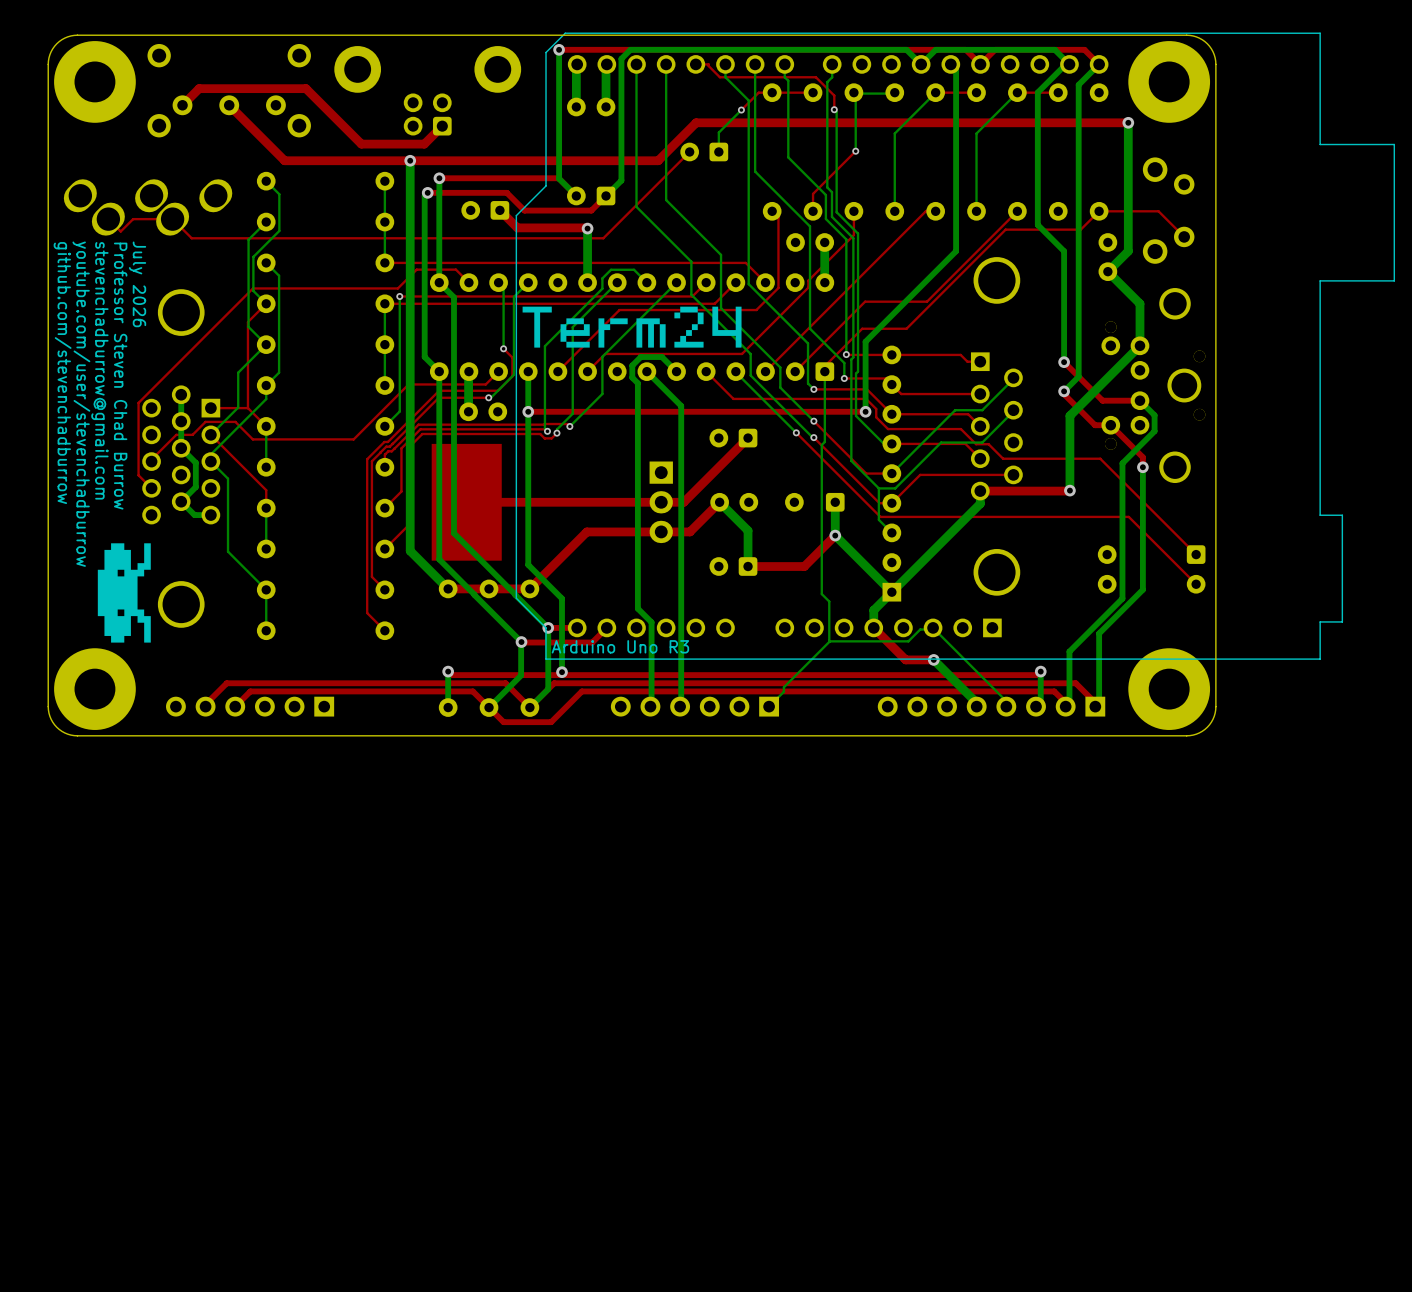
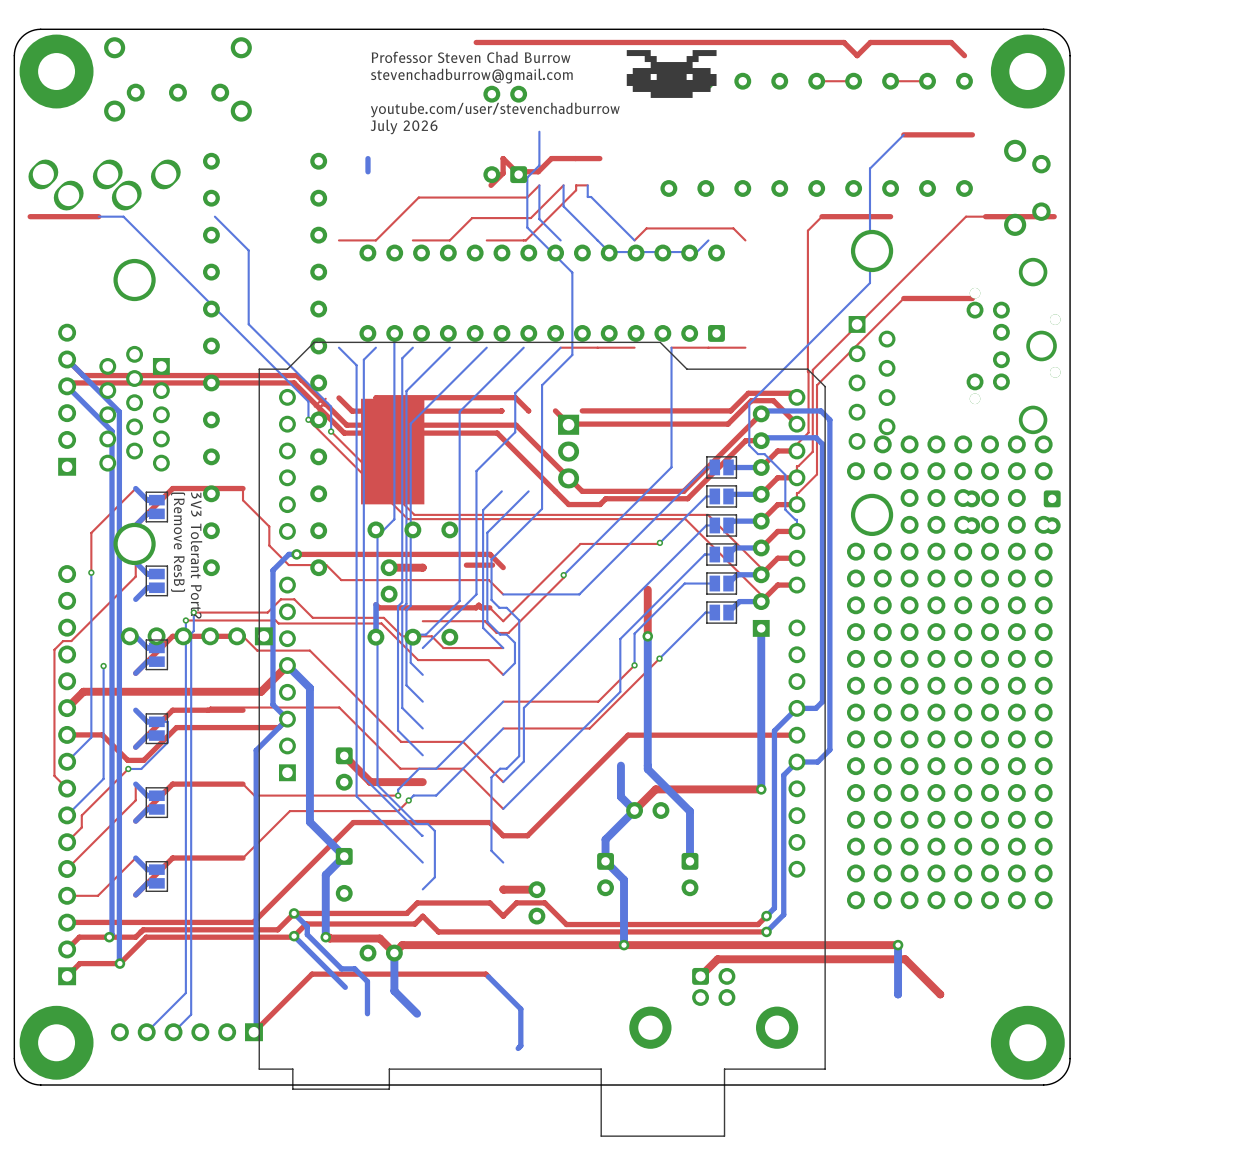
bottom track: (559, 49) (559, 178) (576, 195) -> none
via: (559, 49) -> none
drawing: none -> [626, 50, 717, 98]
bottom track: (577, 64) (576, 107) -> none
bottom track: (606, 64) (606, 107) -> none
bottom track: (636, 64) (636, 206) (691, 261) (691, 294) (750, 354) (750, 375) (813, 437) -> none
bottom track: (666, 64) (666, 200) (721, 254) (721, 308) (780, 367) (780, 387) (813, 421) -> none
top track: (695, 64) (708, 64) (719, 77) (815, 77) (834, 95) (834, 109) -> none
bottom track: (725, 64) (725, 77) (748, 100) (748, 284) (808, 343) (808, 383) (813, 389) -> none
bottom track: (755, 64) (755, 171) (810, 226) (810, 328) (844, 363) (844, 378) -> none
bottom track: (784, 64) (784, 77) (788, 80) (788, 157) (825, 195) (825, 218) (846, 239) (846, 354) -> none
bottom track: (832, 64) (832, 77) (827, 82) (827, 187) (831, 192) (831, 216) (853, 238) (851, 460) (878, 488) -> none
bottom track: (950, 64) (956, 69) (956, 251) (865, 341) (865, 411) -> none
bottom track: (1099, 64) (1078, 84) (1078, 376) (1064, 391) -> none
text: none -> Professor Steven Chad Burrow (471, 57)
text: none -> stevenchadburrow@gmail.com (471, 76)
part: (427, 90) -> none
top track: (813, 92) (758, 92) (741, 110) -> none
bottom track: (894, 92) (853, 92) -> none
bottom track: (935, 92) (894, 133) (894, 211) -> none
bottom track: (1017, 92) (976, 133) (976, 211) -> none
bottom track: (855, 93) (855, 151) -> none
top track: (182, 105) (199, 88) (306, 88) (361, 144) (424, 144) (442, 126) -> none
top track: (229, 105) (284, 160) (658, 160) (696, 122) (1128, 122) -> none
bottom track: (834, 109) (836, 112) (836, 212) (858, 233) (858, 371) (856, 373) (856, 415) (883, 443) (891, 443) -> none
via: (834, 109) -> none
bottom track: (741, 110) (718, 132) (718, 151) -> none
via: (741, 110) -> none
bottom track: (1128, 122) (1128, 251) (1107, 271) (1139, 303) (1139, 345) (1069, 415) (1069, 490) -> none
via: (1128, 122) -> none
text: none -> youtube.com/user/stevenchadburrow (495, 109)
text: none -> July 2026 (404, 126)
bottom track: none -> (539, 131) (539, 165) (527, 177) (527, 227) (572, 272) (572, 355) (542, 385) (542, 508) (491, 559) (491, 599) (499, 607) (506, 607) (519, 620) (519, 756) (506, 768) (500, 768) (491, 777) (491, 850) (503, 862)
top track: (689, 151) (603, 238) (191, 238) (172, 219) (133, 219) (120, 231) (108, 219) -> none
part: (704, 151) -> none
top track: (855, 151) (813, 193) (813, 211) -> none
via: (855, 151) -> none
bottom track: none -> (903, 134) (869, 168) (869, 283) (749, 403) (749, 445) (758, 454) (764, 454) (785, 474) (785, 509) (796, 519) (796, 531)
top track: none -> (972, 134) (903, 134)
bottom track: (410, 160) (410, 550) (448, 588) -> none
via: (410, 160) -> none
top track: (439, 178) (558, 178) (576, 195) -> none
via: (439, 178) -> none
top track: none -> (599, 158) (551, 158) (538, 171) (516, 171) (503, 158) (503, 173) (491, 185)
bottom track: (266, 181) (279, 194) (279, 230) (253, 256) (253, 290) (266, 303) -> none
bottom track: (384, 181) (384, 262) -> none
top track: (427, 192) (506, 192) (524, 210) (591, 210) (606, 195) -> none
bottom track: (427, 192) (424, 195) (424, 357) (439, 371) (439, 559) (521, 642) -> none
via: (427, 192) -> none
bottom track: (439, 192) (439, 282) (454, 297) (454, 533) (548, 627) (548, 689) (529, 707) -> none
bottom track: (606, 195) (621, 180) (621, 58) (630, 49) (906, 49) (921, 64) (935, 49) (1054, 49) (1069, 64) (1065, 64) (1037, 92) (1037, 224) (1064, 251) (1064, 362) -> none
top track: none -> (539, 185) (527, 197) (418, 197) (375, 240) (338, 240)
bottom track: none -> (539, 185) (539, 219) (560, 240)
top track: none -> (563, 185) (530, 218) (472, 218) (449, 240) (412, 240)
bottom track: none -> (563, 185) (563, 206) (609, 252) (696, 252) (708, 240)
top track: none -> (587, 185) (576, 185) (576, 190) (525, 240) (486, 240)
bottom track: none -> (587, 185) (587, 196) (591, 196) (634, 240)
part: (485, 210) -> none
top track: (499, 210) (517, 227) (587, 228) -> none
top track: (772, 211) (778, 217) (778, 287) (756, 310) (619, 310) (557, 371) -> none
top track: (853, 211) (853, 235) (808, 280) (808, 287) (742, 353) (605, 353) (587, 371) -> none
top track: (935, 211) (925, 211) (765, 371) -> none
top track: (1017, 211) (927, 301) (865, 301) (795, 371) -> none
bottom track: (266, 222) (248, 239) (248, 326) (266, 344) (238, 372) (238, 407) (210, 434) -> none
bottom track: (587, 228) (587, 282) -> none
via: (587, 228) -> none
top track: (1184, 236) (1158, 211) (1099, 211) (1080, 229) (1005, 229) (906, 328) (862, 328) (824, 366) (824, 371) -> none
top track: none -> (98, 216) (30, 216)
bottom track: none -> (98, 216) (123, 216) (308, 401) (308, 419)
bottom track: none -> (214, 216) (248, 250) (248, 324) (331, 406) (331, 431)
part: (810, 242) -> none
bottom track: (824, 242) (824, 282) -> none
top track: none -> (890, 216) (821, 216) (807, 230) (808, 432) (790, 450)
top track: none -> (1054, 216) (966, 216) (812, 369) (812, 451) (796, 466) (796, 477) (777, 477) (761, 494)
part: (1107, 257) -> none
bottom track: (266, 262) (279, 275) (279, 372) (266, 385) (266, 399) (210, 454) (210, 461) (228, 478) (228, 551) (266, 589) (266, 630) -> none
top track: (384, 262) (745, 262) (765, 282) -> none
top track: none -> (745, 240) (733, 228) (646, 228) (634, 240)
top track: (468, 282) (455, 269) (416, 269) (397, 288) (252, 288) (138, 402) (138, 475) (151, 488) -> none
bottom track: (498, 282) (503, 287) (503, 348) -> none
bottom track: (528, 282) (513, 296) (513, 374) (488, 397) -> none
bottom track: (617, 282) (572, 327) (572, 413) (556, 429) (556, 433) -> none
bottom track: (646, 282) (634, 269) (611, 269) (602, 278) (602, 288) (544, 346) (544, 428) (547, 431) -> none
bottom track: (676, 282) (602, 356) (602, 393) (569, 426) -> none
top track: (706, 282) (692, 296) (399, 296) -> none
top track: (735, 282) (714, 303) (384, 303) -> none
text: July 2026 (137, 284) -> none
bottom track: (399, 296) (399, 411) (384, 426) -> none
via: (399, 296) -> none
top track: (266, 303) (247, 322) (247, 408) -> none
bottom track: (384, 303) (384, 385) -> none
drawing: [522, 306, 742, 348] -> none
top track: none -> (972, 298) (903, 298) (817, 385) (817, 474) (796, 493) (796, 504) (777, 504) (761, 521)
part: (955, 346) -> none
top track: (503, 348) (512, 357) (512, 376) (498, 390) (439, 390) (387, 441) (384, 441) (367, 459) (367, 613) (384, 630) -> none
via: (503, 348) -> none
top track: (846, 354) (960, 354) (967, 361) (980, 361) -> none
via: (846, 354) -> none
top track: (1064, 362) (1102, 400) (1139, 400) -> none
via: (1064, 362) -> none
text: stevenchadburrow@gmail.com (99, 370) -> none
bottom track width: thick (468, 371) (468, 411) -> thin (394, 333) (394, 369)
top track: (498, 371) (485, 384) (408, 384) (353, 439) (252, 439) (235, 421) (205, 421) (192, 434) (176, 434) (151, 461) -> none
bottom track: (528, 371) (528, 564) (562, 598) (562, 672) -> none
bottom track: (646, 371) (681, 405) (680, 706) -> none
bottom track: (676, 371) (661, 357) (640, 357) (632, 365) (632, 377) (637, 383) (637, 608) (651, 622) (650, 706) -> none
top track: (706, 371) (733, 398) (866, 398) (876, 408) (876, 417) (888, 429) (960, 429) (976, 444) (988, 444) (1003, 458) (1100, 458) (1196, 554) -> none
bottom track: (735, 371) (796, 432) -> none
bottom track: (824, 371) (824, 441) (821, 445) (821, 594) (829, 601) (829, 641) -> none
text: github.com/stevenchadburrow (62, 373) -> none
text: Professor Steven Chad Burrow (120, 376) -> none
bottom track: (1013, 377) (982, 410) (955, 410) (891, 473) -> none
top track: (844, 378) (885, 378) (901, 394) (980, 394) -> none
via: (844, 378) -> none
bottom track: none -> (338, 347) (356, 365) (356, 796) (422, 862)
bottom track: none -> (375, 347) (363, 359) (363, 777) (422, 835)
bottom track: none -> (412, 347) (402, 358) (402, 602) (398, 606) (398, 730) (422, 755)
bottom track: none -> (449, 347) (406, 391) (406, 604) (402, 608) (402, 707) (422, 728)
bottom track: none -> (486, 347) (410, 423) (410, 605) (406, 609) (406, 685) (422, 701)
bottom track: none -> (523, 347) (459, 411) (459, 600) (426, 634) (419, 634) (410, 643) (410, 662) (422, 674)
bottom track: none -> (560, 347) (515, 393) (515, 432) (476, 471) (476, 594) (422, 648)
top track: none -> (634, 347) (560, 347)
bottom track: none -> (671, 347) (671, 467) (563, 575)
top track: none -> (745, 347) (671, 347)
top track: (813, 389) (866, 389) (891, 414) (968, 414) (980, 426) -> none
via: (813, 389) -> none
top track: (1064, 391) (1064, 394) (1095, 425) (1110, 425) (1142, 457) (1142, 467) -> none
via: (1064, 391) -> none
bottom track: (181, 394) (181, 448) (195, 462) (195, 487) (181, 501) (194, 515) (210, 515) -> none
top track: (488, 397) (438, 397) (392, 443) -> none
via: (488, 397) -> none
top track: none -> (67, 359) (83, 375) (297, 375) (301, 380)
bottom track: none -> (67, 359) (119, 411) (119, 963)
bottom track: (1139, 400) (1154, 415) (1154, 431) (1122, 463) (1122, 598) (1069, 651) (1069, 702) (1065, 706) -> none
text: youtube.com/user/stevenchadburrow (81, 404) -> none
top track: (247, 408) (266, 426) -> none
top track: (247, 408) (210, 408) -> none
bottom track: (1013, 410) (982, 442) (941, 442) (895, 488) (878, 488) -> none
bottom track: none -> (394, 369) (394, 519) (377, 536) (377, 784) (416, 823) (427, 823) (434, 831) (434, 877) (422, 889)
part: (483, 411) -> none
via: (528, 411) -> none
top track: (865, 411) (528, 411) -> none
via: (865, 411) -> none
top track: (813, 421) (866, 473) (891, 473) -> none
via: (813, 421) -> none
top track: none -> (302, 380) (346, 425) (516, 425) (582, 491) (683, 491) (761, 413)
bottom track: (266, 426) (266, 467) -> none
top track: (569, 426) (567, 424) (418, 424) (394, 448) -> none
via: (569, 426) -> none
top track: none -> (67, 386) (70, 382) (294, 382) (344, 433) (497, 433) (568, 504) (600, 504) (605, 498) (687, 498) (745, 440) (761, 440)
bottom track: none -> (67, 386) (111, 431) (111, 934) (109, 937)
top track: (547, 431) (545, 429) (420, 429) (401, 448) (401, 491) (384, 508) -> none
via: (547, 431) -> none
top track: (796, 432) (880, 516) (1128, 516) (1196, 584) -> none
via: (796, 432) -> none
top track: (556, 433) (551, 438) (544, 438) -> none
via: (556, 433) -> none
top track: (210, 434) (266, 490) (266, 508) -> none
top track: (813, 437) (879, 503) (891, 503) (920, 474) (1013, 474) -> none
via: (813, 437) -> none
top track: (544, 438) (540, 434) (422, 434) (407, 449) (407, 526) (384, 548) -> none
part: (733, 438) -> none
top track: (748, 438) (683, 502) (466, 502) -> none
top track: none -> (338, 397) (352, 411) (501, 410)
top track: none -> (375, 397) (515, 397) (528, 410)
top track: none -> (796, 397) (792, 393) (748, 393) (730, 410) (582, 410)
top track: (891, 443) (965, 443) (980, 458) -> none
part: none -> (67, 399)
top track: (380, 452) (371, 461) (371, 576) (384, 589) -> none
top track: none -> (555, 410) (568, 424) (728, 424) (751, 400) (773, 400) (796, 424)
bottom track: none -> (761, 413) (764, 410) (820, 410) (829, 419) (829, 749) (817, 762) (796, 762) (783, 775) (783, 914) (766, 931)
top track: none -> (308, 419) (407, 519) (685, 519) (764, 598)
via: none -> (308, 419)
bottom track: (1142, 467) (1142, 589) (1099, 633) (1099, 702) (1095, 706) -> none
via: (1142, 467) -> none
part position: (891, 473) -> (761, 521)
top track: none -> (331, 431) (414, 514) (708, 514) (764, 571)
via: none -> (331, 431)
bottom track: (878, 488) (878, 519) (891, 532) -> none
bottom track: none -> (761, 440) (764, 437) (816, 437) (822, 444) (822, 701) (815, 708) (796, 708) (774, 730) (774, 908) (766, 916)
top track: (1069, 490) (980, 491) -> none
via: (1069, 490) -> none
bottom track: (980, 491) (980, 503) (873, 610) (873, 627) -> none
part: none -> (882, 444)
part: none -> (909, 444)
part: none -> (936, 444)
part: none -> (963, 444)
part: none -> (990, 444)
part: none -> (1016, 444)
part: none -> (1043, 444)
top track: none -> (796, 450) (777, 450) (761, 467)
top track: (719, 502) (689, 531) (586, 531) (529, 588) (448, 588) -> none
bottom track: (719, 502) (748, 530) (748, 566) -> none
part: (734, 502) -> none
part: (814, 502) -> none
bottom track: (835, 502) (835, 535) (891, 592) -> none
bottom track: (266, 508) (266, 548) -> none
bottom track: none -> (714, 467) (706, 467) (579, 594) (503, 594)
part: none -> (721, 467)
bottom track: none -> (761, 467) (728, 467)
part: none -> (855, 471)
part: none -> (882, 471)
part: none -> (909, 471)
part: none -> (936, 471)
part: none -> (963, 471)
part: none -> (990, 471)
part: none -> (1016, 471)
part: none -> (1043, 471)
top track: (835, 535) (804, 566) (748, 566) -> none
via: (835, 535) -> none
drawing: [97, 543, 151, 643] -> none
top track: none -> (135, 488) (91, 532) (91, 572)
bottom track: none -> (135, 488) (147, 500) (156, 500)
bottom track: none -> (501, 491) (483, 510) (483, 627) (503, 648)
bottom track: none -> (528, 491) (487, 532) (487, 621) (500, 634) (506, 634) (514, 642) (514, 663) (503, 674)
bottom track: none -> (761, 494) (730, 494) (728, 496)
bottom track: none -> (714, 496) (706, 496) (659, 542)
part: none -> (721, 496)
part: none -> (909, 498)
part: none -> (936, 498)
part: none -> (963, 498)
part: none -> (990, 498)
part: none -> (1016, 498)
part: none -> (156, 507)
part: (733, 566) -> none
bottom track: none -> (156, 513) (147, 513) (135, 525)
bottom track: none -> (761, 521) (732, 521) (728, 525)
part: none -> (909, 524)
part: none -> (936, 524)
part: none -> (963, 524)
part: none -> (990, 524)
part: none -> (1016, 524)
part: none -> (1043, 524)
top track: none -> (135, 525) (172, 488) (243, 488) (243, 500) (269, 526) (269, 545) (288, 565) (326, 565) (341, 580) (488, 580) (503, 594)
bottom track: none -> (714, 525) (706, 525) (523, 707) (523, 761) (503, 782)
part: none -> (721, 525)
top track: none -> (796, 531) (777, 531) (761, 547)
via: none -> (659, 542)
bottom track: none -> (761, 547) (735, 547) (728, 554)
part: none -> (855, 551)
part: none -> (882, 551)
part: none -> (909, 551)
part: none -> (936, 551)
part: none -> (963, 551)
part: none -> (990, 551)
part: none -> (1016, 551)
part: none -> (1043, 551)
text: none -> (Remove ResB) (178, 542)
top track: none -> (296, 554) (490, 554) (503, 567)
bottom track: none -> (296, 554) (288, 554) (272, 570) (272, 704) (287, 719) (256, 750) (256, 1030) (253, 1032)
via: none -> (296, 554)
bottom track: none -> (714, 554) (704, 554) (620, 638) (620, 691) (503, 808)
part: none -> (721, 554)
top track: none -> (796, 558) (777, 558) (761, 574)
top track: none -> (135, 562) (135, 576) (71, 641) (63, 641) (54, 649) (54, 775) (67, 788)
bottom track: none -> (135, 562) (147, 574) (156, 574)
via: (548, 627) -> none
top track: (606, 627) (592, 642) (521, 642) -> none
top track: (873, 627) (905, 659) (933, 659) -> none
text: none -> 3V3 Tolerant Port? (196, 555)
top track: none -> (422, 567) (389, 567)
bottom track: none -> (91, 572) (91, 737) (67, 761)
via: none -> (91, 572)
top track: none -> (563, 575) (563, 577) (508, 632) (496, 632) (484, 621) (422, 621)
via: none -> (563, 575)
bottom track: none -> (761, 574) (737, 574) (728, 583)
bottom track: (829, 641) (783, 687) (783, 691) (769, 706) -> none
bottom track: (829, 641) (908, 641) (920, 629) (933, 627) (1006, 701) (1006, 706) -> none
bottom track: (521, 642) (521, 675) (489, 707) -> none
via: (521, 642) -> none
part: none -> (855, 578)
part: none -> (882, 578)
part: none -> (909, 578)
part: none -> (936, 578)
part: none -> (963, 578)
part: none -> (990, 578)
part: none -> (1016, 578)
part: none -> (1043, 578)
part: none -> (156, 580)
part: none -> (389, 580)
text: Arduino Uno R3 (620, 646) -> none
bottom track: none -> (714, 583) (684, 583) (634, 633) (634, 665)
part: none -> (721, 583)
top track: none -> (796, 585) (777, 585) (761, 601)
bottom track: none -> (156, 587) (147, 587) (135, 599)
top track: none -> (647, 589) (647, 636)
bottom track: (933, 659) (976, 702) (976, 706) -> none
via: (933, 659) -> none
bottom track: none -> (761, 601) (739, 601) (728, 612)
via: (448, 671) -> none
top track: (1040, 671) (1037, 675) (574, 675) -> (659, 542) (580, 543) (503, 621) (489, 607)
bottom track: (1040, 671) (1040, 705) (1036, 706) -> none
via: (1040, 671) -> none
via: (562, 672) -> none
part: none -> (855, 605)
part: none -> (882, 605)
part: none -> (909, 605)
part: none -> (936, 605)
part: none -> (963, 605)
part: none -> (990, 605)
part: none -> (1016, 605)
part: none -> (1043, 605)
top track: none -> (193, 612) (267, 612) (280, 599) (294, 599) (312, 617) (383, 617) (402, 636) (431, 636) (443, 648) (503, 648)
bottom track: none -> (193, 612) (193, 631) (191, 633) (191, 1014) (173, 1032)
via: none -> (193, 612)
bottom track: none -> (714, 612) (705, 612) (659, 658)
part: none -> (721, 612)
part: (94, 689) -> none
top track: none -> (185, 620) (275, 620) (278, 623) (381, 623) (418, 660) (488, 660) (503, 674)
bottom track: none -> (185, 620) (185, 993) (146, 1032)
via: none -> (185, 620)
part: (1169, 689) -> none
bottom track: none -> (761, 628) (761, 789)
part: none -> (855, 632)
part: none -> (882, 632)
part: none -> (909, 632)
part: none -> (936, 632)
part: none -> (963, 632)
part: none -> (990, 632)
part: none -> (1016, 632)
part: none -> (1043, 632)
bottom track: none -> (135, 636) (147, 647) (156, 647)
part: (694, 706) -> none
bottom track: none -> (647, 636) (647, 769) (689, 811) (689, 861)
via: none -> (647, 636)
part: (991, 706) -> none
top track: (1065, 706) (1065, 702) (1054, 691) (581, 691) (551, 722) (503, 722) (472, 691) (250, 691) (235, 706) -> none
top track: (1095, 706) (1095, 702) (1075, 683) (554, 683) (529, 707) (505, 683) (226, 683) (205, 706) -> none
board edge: (1215, 706) (1212, 719) (1207, 727) (1199, 732) (1186, 735) (77, 735) (67, 734) (56, 727) (51, 719) (48, 706) -> (1070, 636) (1069, 1061) (1062, 1077) (1052, 1083) (1043, 1085) (40, 1085) (29, 1082) (18, 1072) (14, 1058) (14, 636)
part: none -> (156, 654)
top track: none -> (659, 658) (589, 728) (503, 728)
via: none -> (659, 658)
part: none -> (855, 658)
part: none -> (882, 658)
part: none -> (909, 658)
part: none -> (936, 658)
part: none -> (963, 658)
part: none -> (990, 658)
part: none -> (1016, 658)
part: none -> (1043, 658)
bottom track: none -> (156, 661) (147, 661) (135, 673)
top track: none -> (287, 665) (261, 691) (83, 691) (67, 708)
bottom track: none -> (287, 665) (309, 688) (309, 822) (344, 856) (325, 874) (325, 937)
top track: none -> (634, 665) (598, 701) (503, 701)
via: none -> (634, 665)
bottom track: none -> (103, 666) (103, 778) (67, 815)
via: none -> (103, 666)
top track: none -> (135, 673) (172, 636) (243, 636) (257, 650) (309, 650) (401, 741) (463, 741) (503, 782)
part: none -> (855, 685)
part: none -> (882, 685)
part: none -> (909, 685)
part: none -> (936, 685)
part: none -> (963, 685)
part: none -> (990, 685)
part: none -> (1016, 685)
part: none -> (1043, 685)
bottom track: none -> (503, 701) (436, 768) (419, 768) (398, 789) (398, 795)
bottom track: none -> (135, 710) (147, 721) (167, 721) (167, 742) (141, 768) (128, 768)
top track: none -> (207, 710) (210, 707) (339, 707) (400, 768) (463, 768) (503, 808)
top track: none -> (243, 710) (172, 710) (135, 747)
part: none -> (855, 712)
part: none -> (882, 712)
part: none -> (909, 712)
part: none -> (936, 712)
part: none -> (963, 712)
part: none -> (990, 712)
part: none -> (1016, 712)
part: none -> (1043, 712)
top track: none -> (287, 719) (279, 727) (176, 727) (143, 760) (127, 760) (102, 734) (67, 734)
part: none -> (156, 728)
bottom track: none -> (503, 728) (436, 795) (413, 795) (408, 800)
top track: none -> (796, 735) (628, 735) (527, 835) (503, 835) (490, 822) (353, 822) (253, 922) (67, 922)
bottom track: none -> (156, 735) (147, 735) (135, 747)
part: none -> (542, 739)
part: none -> (855, 739)
part: none -> (882, 739)
part: none -> (909, 739)
part: none -> (936, 739)
part: none -> (963, 739)
part: none -> (990, 739)
part: none -> (1016, 739)
part: none -> (1043, 739)
top track: none -> (344, 755) (370, 782) (422, 782)
bottom track: none -> (620, 765) (620, 796) (634, 810) (605, 839) (605, 861) (624, 879) (624, 945)
part: none -> (855, 766)
part: none -> (882, 766)
part: none -> (909, 766)
part: none -> (936, 766)
part: none -> (963, 766)
part: none -> (990, 766)
part: none -> (1016, 766)
part: none -> (1043, 766)
top track: none -> (128, 768) (81, 815) (81, 827) (67, 842)
via: none -> (128, 768)
part: none -> (344, 769)
part: none -> (67, 775)
top track: none -> (135, 784) (135, 800) (67, 869)
bottom track: none -> (135, 784) (147, 795) (156, 795)
top track: none -> (761, 789) (655, 789) (634, 810)
via: none -> (761, 789)
part: none -> (855, 792)
part: none -> (882, 792)
part: none -> (909, 792)
part: none -> (936, 792)
part: none -> (963, 792)
part: none -> (990, 792)
part: none -> (1016, 792)
part: none -> (1043, 792)
top track: none -> (398, 795) (254, 795) (243, 784) (172, 784) (135, 821)
via: none -> (398, 795)
top track: none -> (408, 800) (398, 811) (289, 811) (243, 858) (172, 858) (135, 894)
via: none -> (408, 800)
part: none -> (156, 802)
bottom track: none -> (156, 809) (147, 809) (135, 821)
part: none -> (647, 810)
part: none -> (855, 819)
part: none -> (882, 819)
part: none -> (909, 819)
part: none -> (936, 819)
part: none -> (963, 819)
part: none -> (990, 819)
part: none -> (1016, 819)
part: none -> (1043, 819)
part: none -> (855, 846)
part: none -> (882, 846)
part: none -> (909, 846)
part: none -> (936, 846)
part: none -> (963, 846)
part: none -> (990, 846)
part: none -> (1016, 846)
part: none -> (1043, 846)
top track: none -> (135, 858) (97, 895) (67, 895)
bottom track: none -> (135, 858) (147, 869) (156, 869)
part: none -> (855, 873)
part: none -> (882, 873)
part: none -> (909, 873)
part: none -> (936, 873)
part: none -> (963, 873)
part: none -> (990, 873)
part: none -> (1016, 873)
part: none -> (1043, 873)
part: none -> (344, 874)
part: none -> (605, 874)
part: none -> (689, 874)
part: none -> (156, 876)
bottom track: none -> (156, 883) (147, 883) (135, 894)
top track: none -> (503, 889) (536, 889)
part: none -> (855, 900)
part: none -> (882, 900)
part: none -> (909, 900)
part: none -> (936, 900)
part: none -> (963, 900)
part: none -> (990, 900)
part: none -> (1016, 900)
part: none -> (1043, 900)
part: none -> (536, 902)
bottom track: none -> (294, 913) (307, 926) (307, 934) (341, 968) (354, 968) (367, 981) (367, 1013)
via: none -> (294, 913)
top track: none -> (766, 916) (758, 924) (566, 924) (544, 902) (516, 902) (503, 916) (490, 903) (417, 903) (406, 913) (294, 913) (277, 929) (143, 929) (141, 931)
via: none -> (766, 916)
top track: none -> (141, 931) (135, 937) (79, 937) (67, 949)
top track: none -> (766, 931) (438, 931) (422, 916) (414, 924) (306, 924) (293, 937) (146, 937) (119, 963) (79, 963) (67, 976)
via: none -> (766, 931)
bottom track: none -> (294, 936) (345, 987)
via: none -> (294, 936)
via: none -> (109, 937)
top track: none -> (325, 937) (379, 938) (394, 953) (402, 945) (898, 945)
via: none -> (325, 937)
via: none -> (624, 945)
bottom track: none -> (898, 945) (898, 994)
via: none -> (898, 945)
part: none -> (381, 953)
bottom track: none -> (394, 953) (394, 991) (417, 1013)
via: none -> (119, 963)
top track: none -> (700, 976) (717, 959) (905, 959) (940, 994)
top track: none -> (488, 976) (485, 974) (312, 974) (253, 1032)
bottom track: none -> (488, 976) (520, 1009) (520, 1045) (518, 1048) (519, 1047)
part: none -> (713, 1008)
part: none -> (186, 1032)
part: none -> (56, 1042)
part: none -> (1027, 1042)

